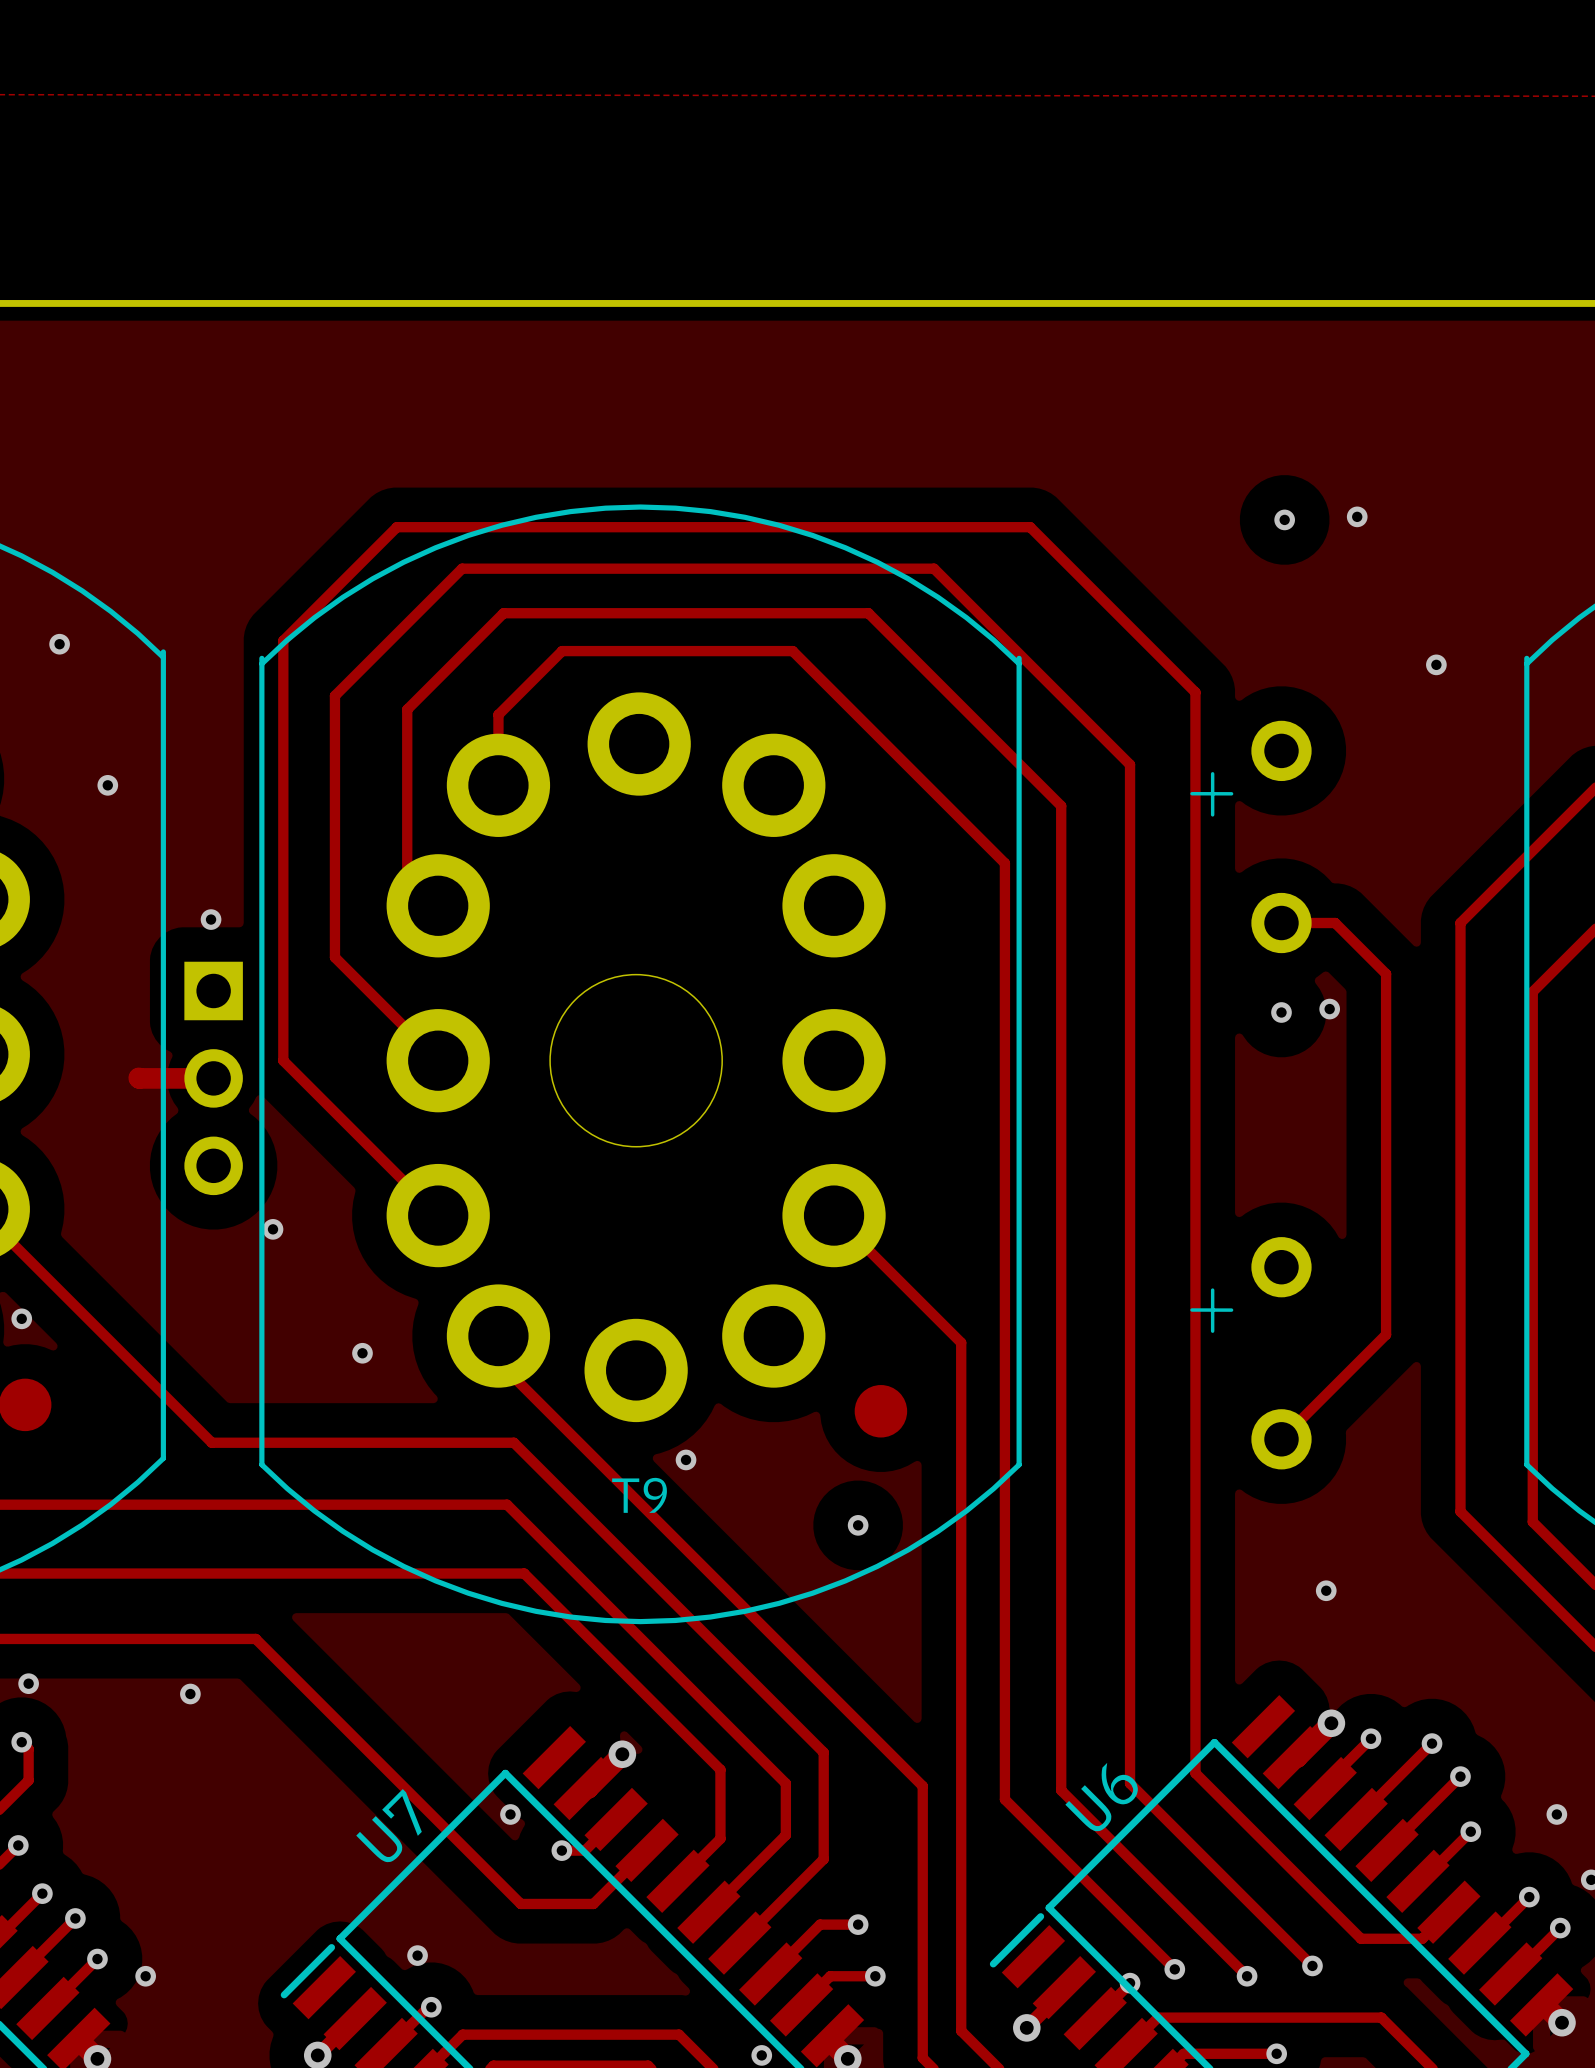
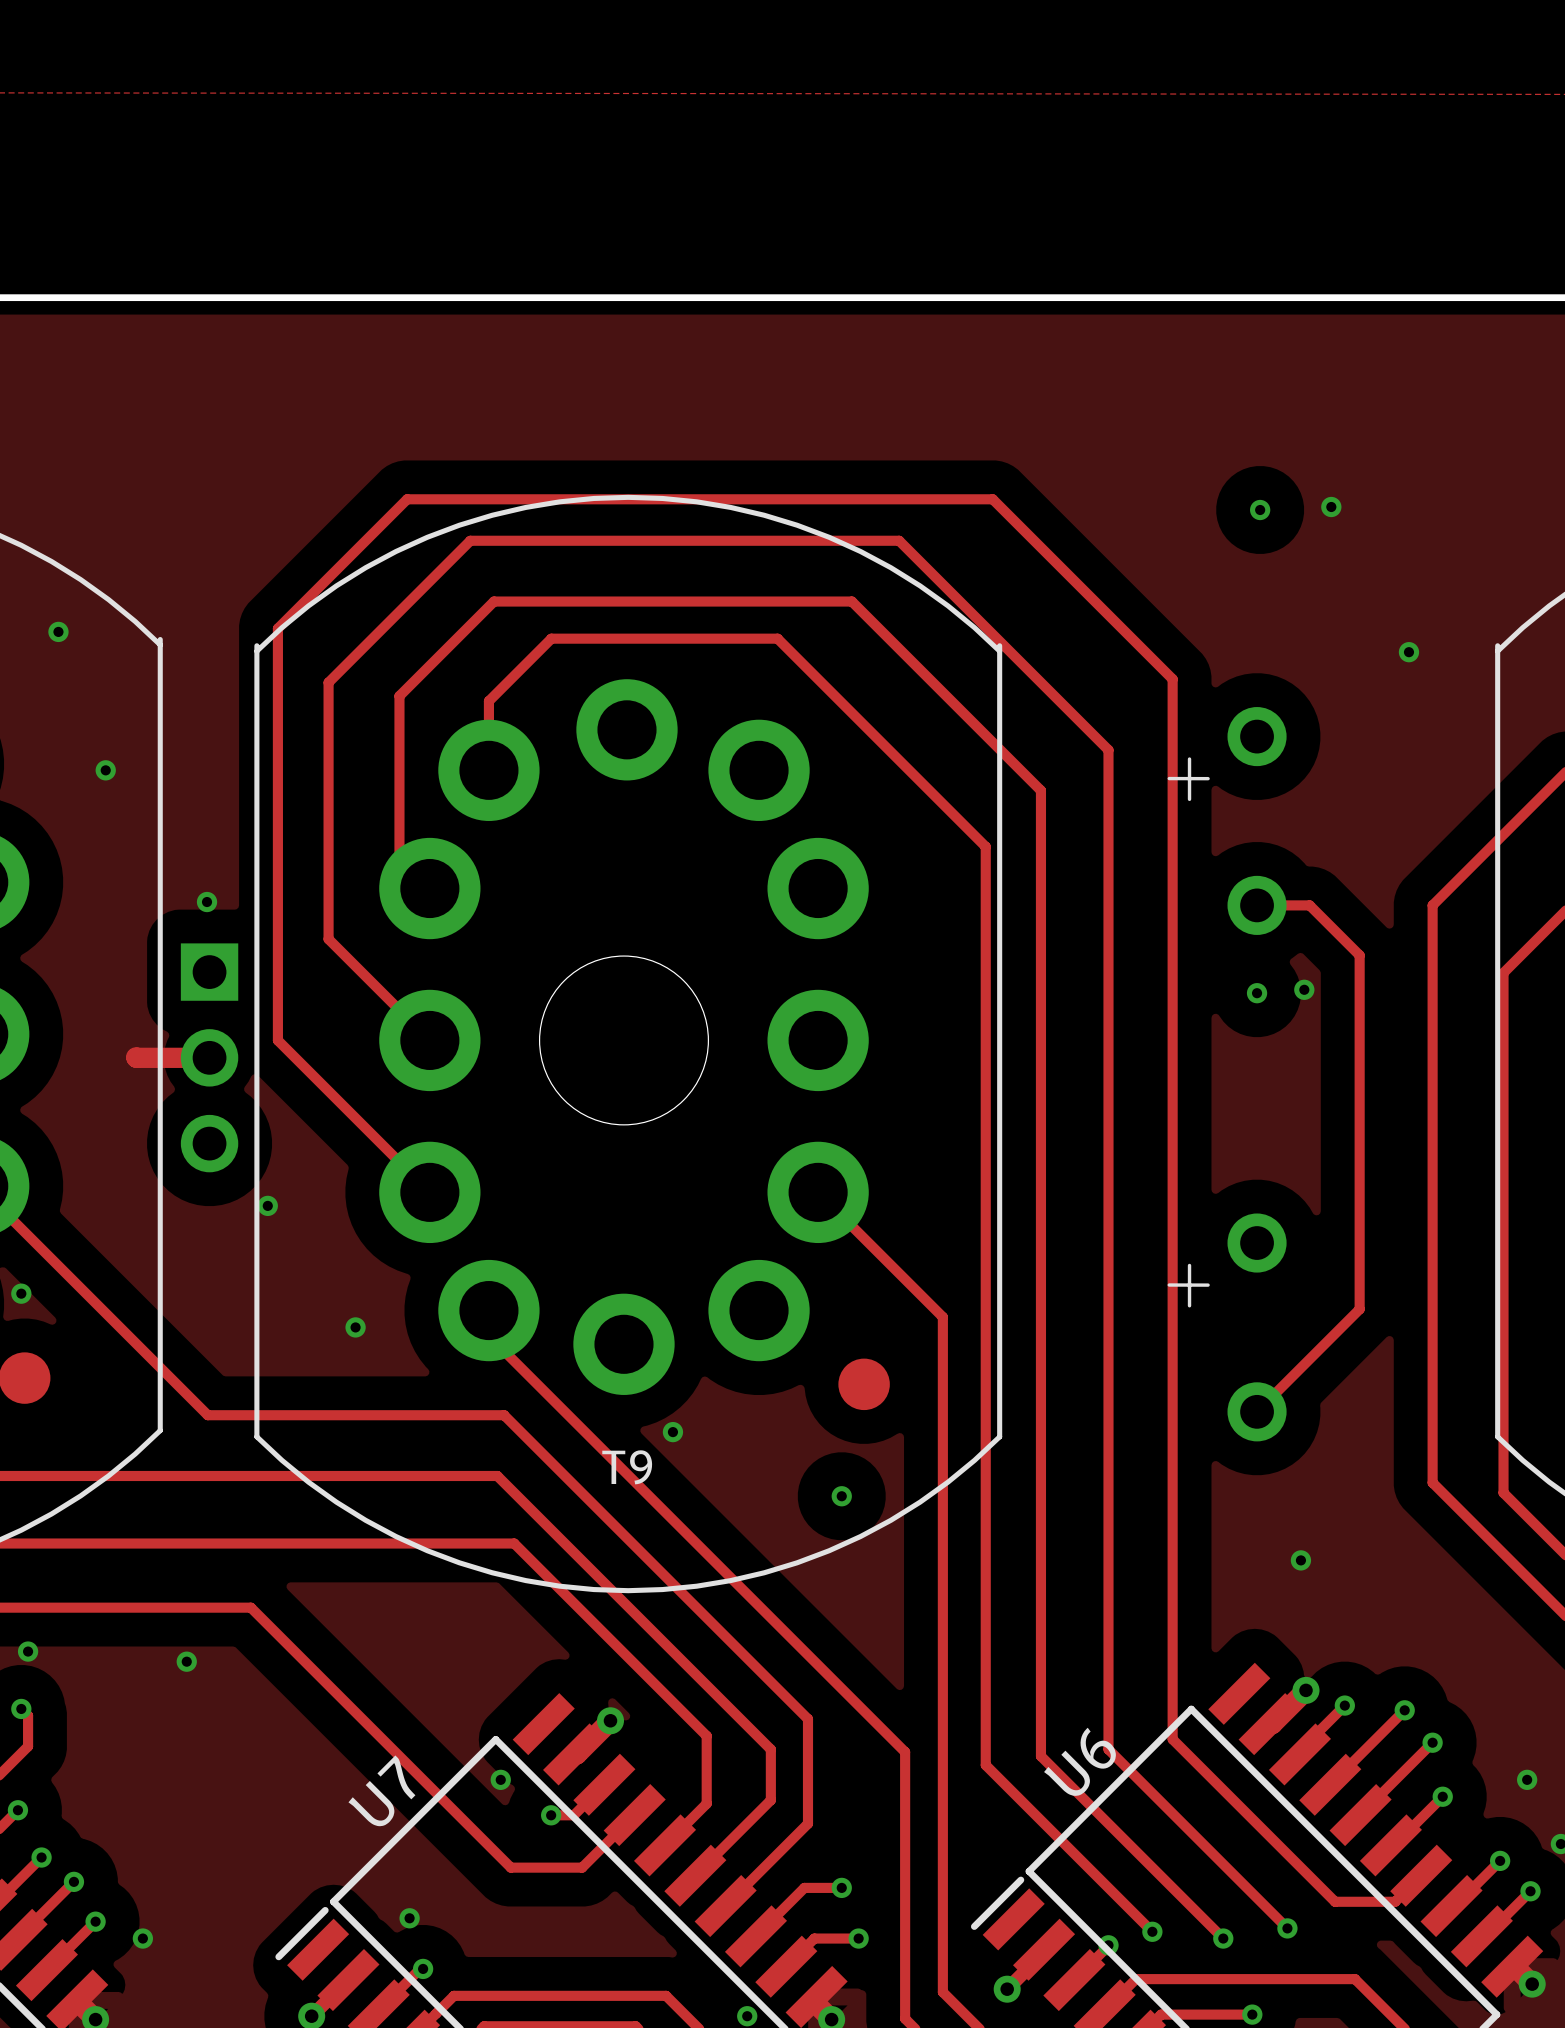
track: (396, 527) (1030, 527) -> (389, 517) (407, 499) (992, 499) (1010, 517)
track: (462, 568) (934, 568) -> (453, 557) (470, 540) (899, 540) (916, 557)

